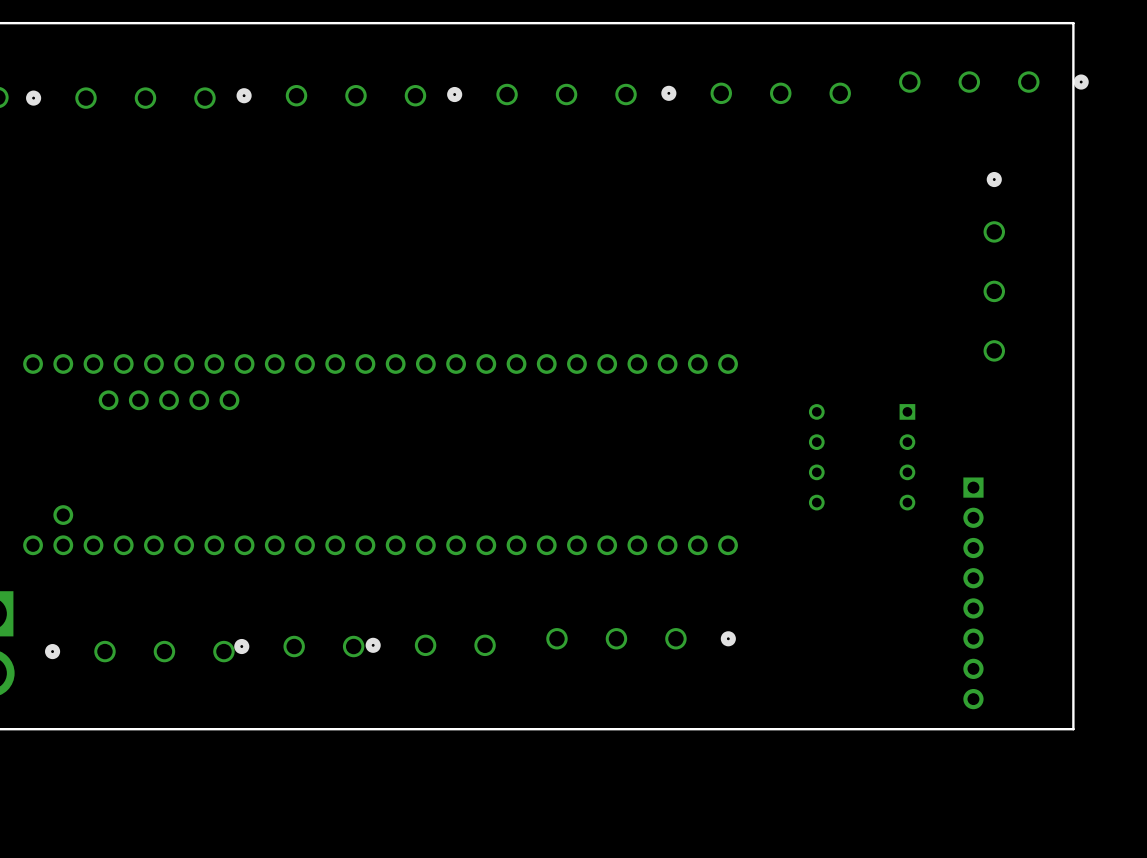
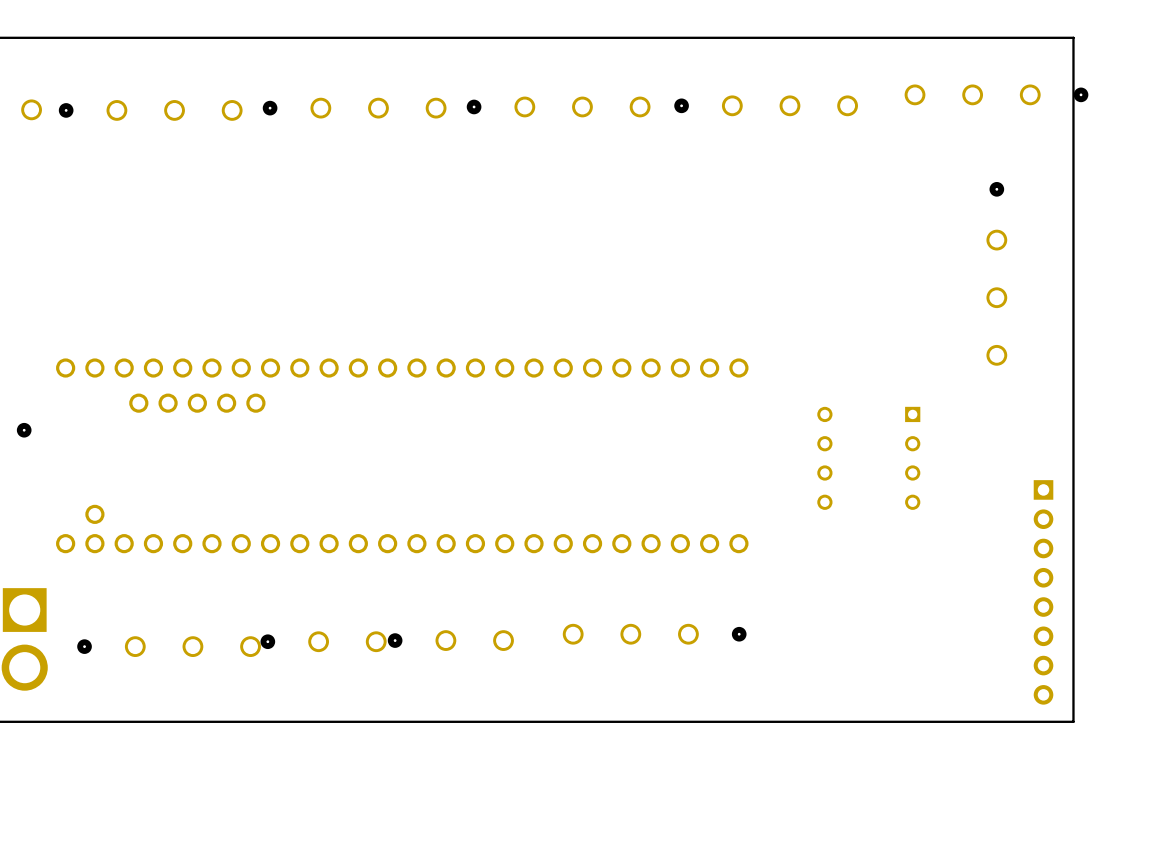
part position: (973, 593) -> (1043, 592)

